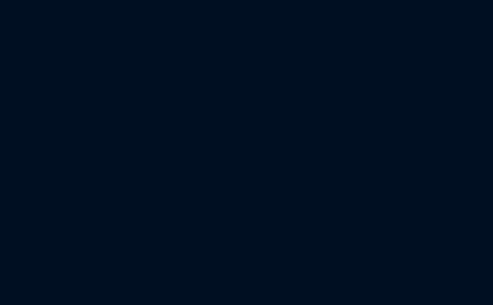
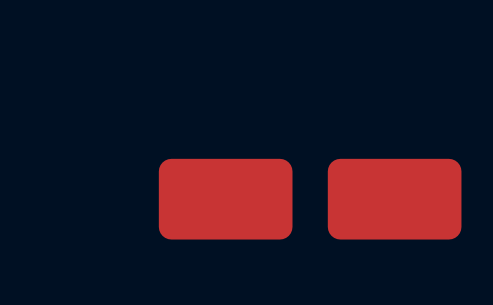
part: none -> (310, 199)

